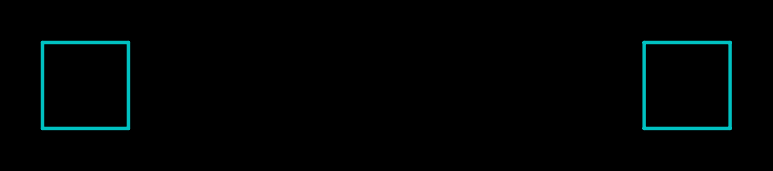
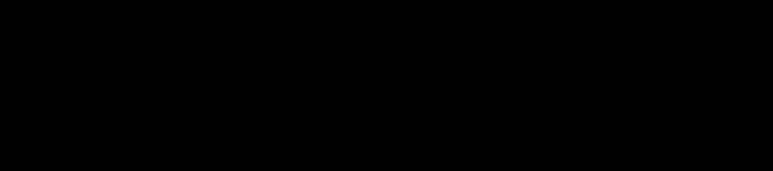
line: (42, 42) (128, 42) (128, 128) (42, 128) (42, 42) -> none
line: (644, 42) (644, 128) (730, 128) (730, 42) (644, 42) -> none

